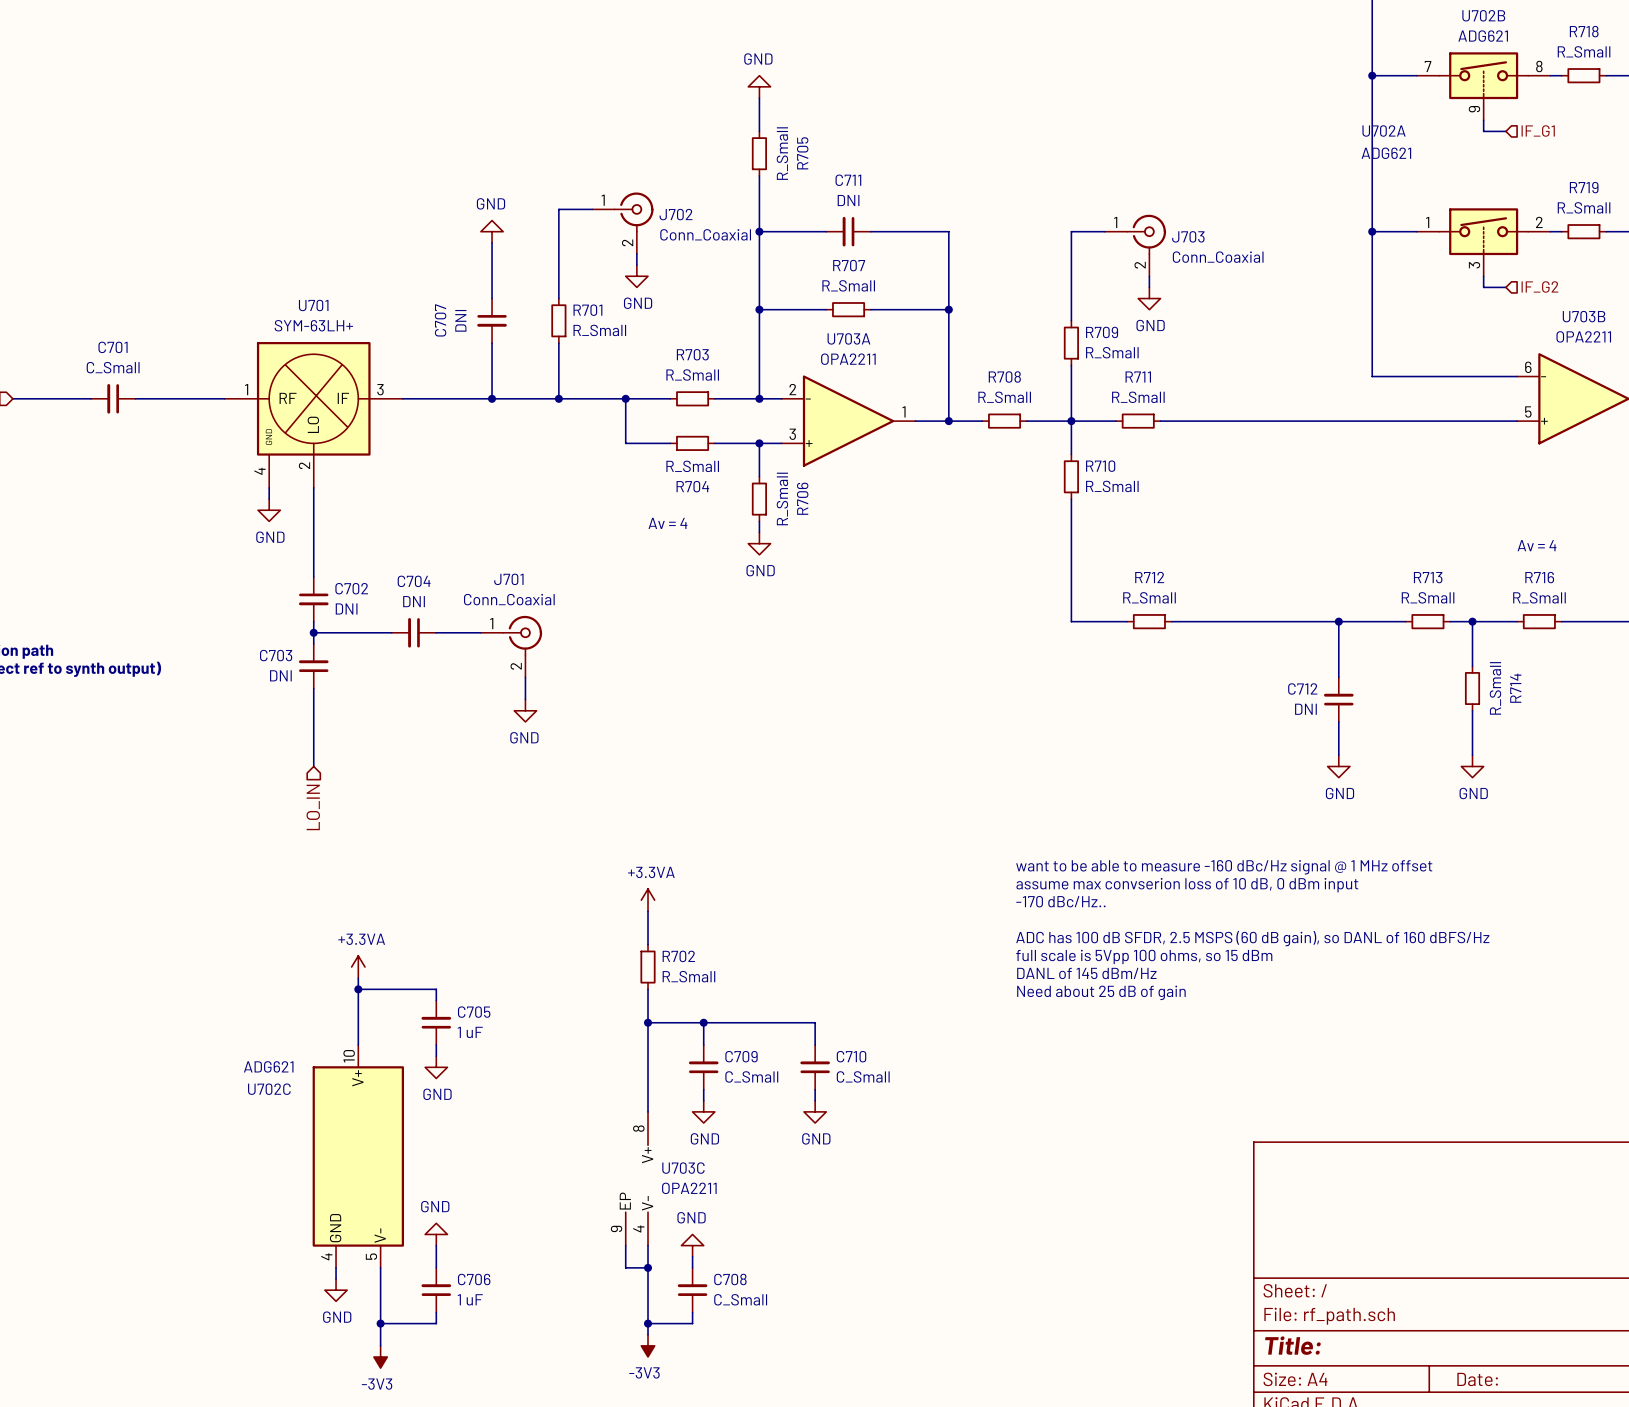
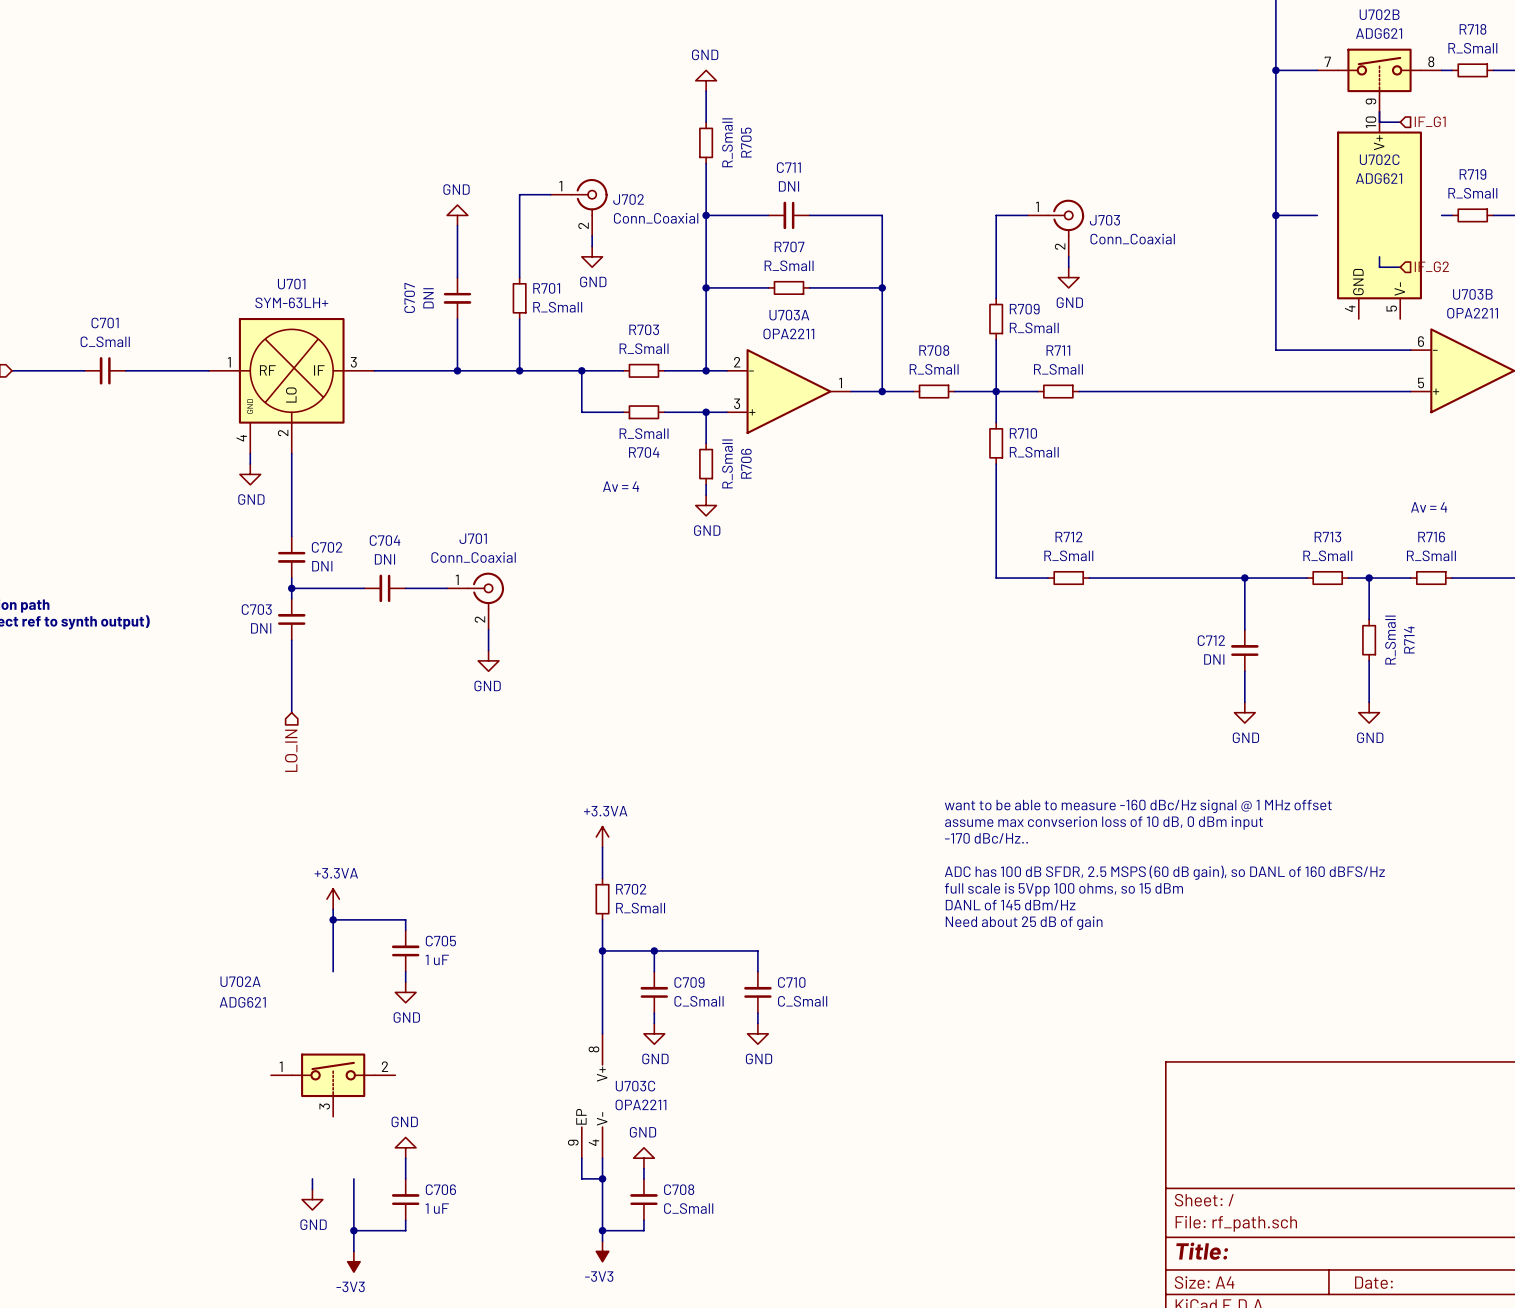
U702A position: (1483, 242) -> (333, 1085)
U702C value position: ADG621 (268, 1066) -> ADG621 (1379, 178)
U702C name position: U702C (269, 1089) -> U702C (1379, 159)
U702C position: (358, 1156) -> (1379, 215)

